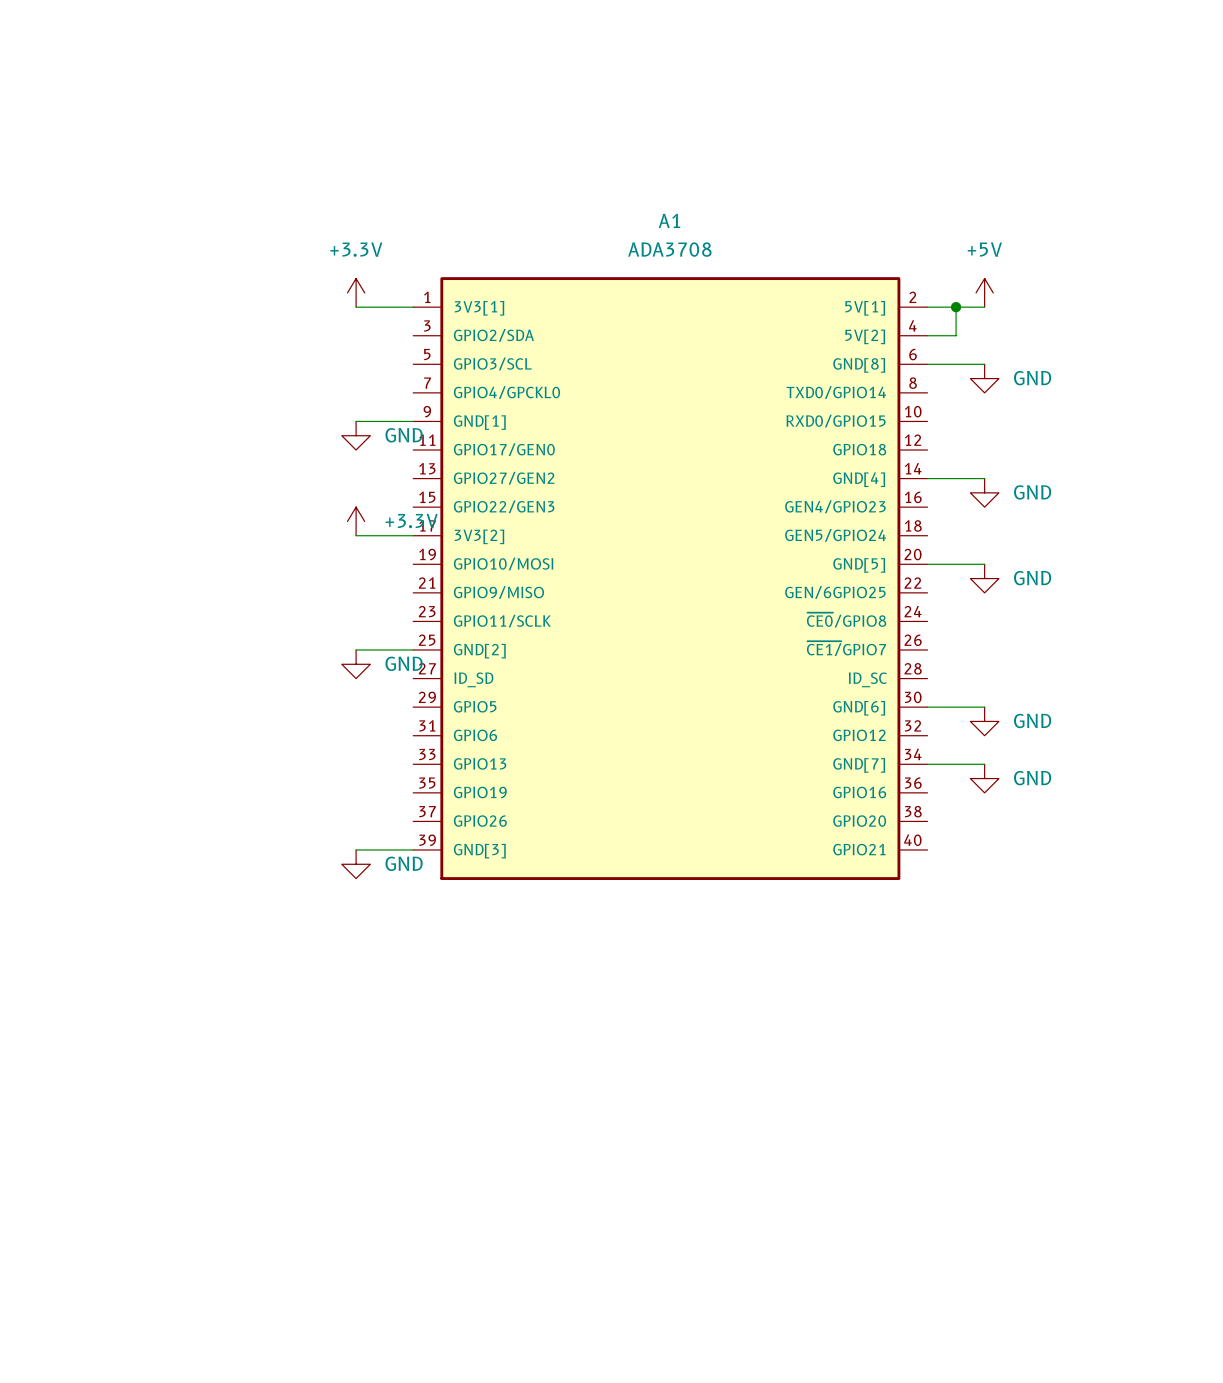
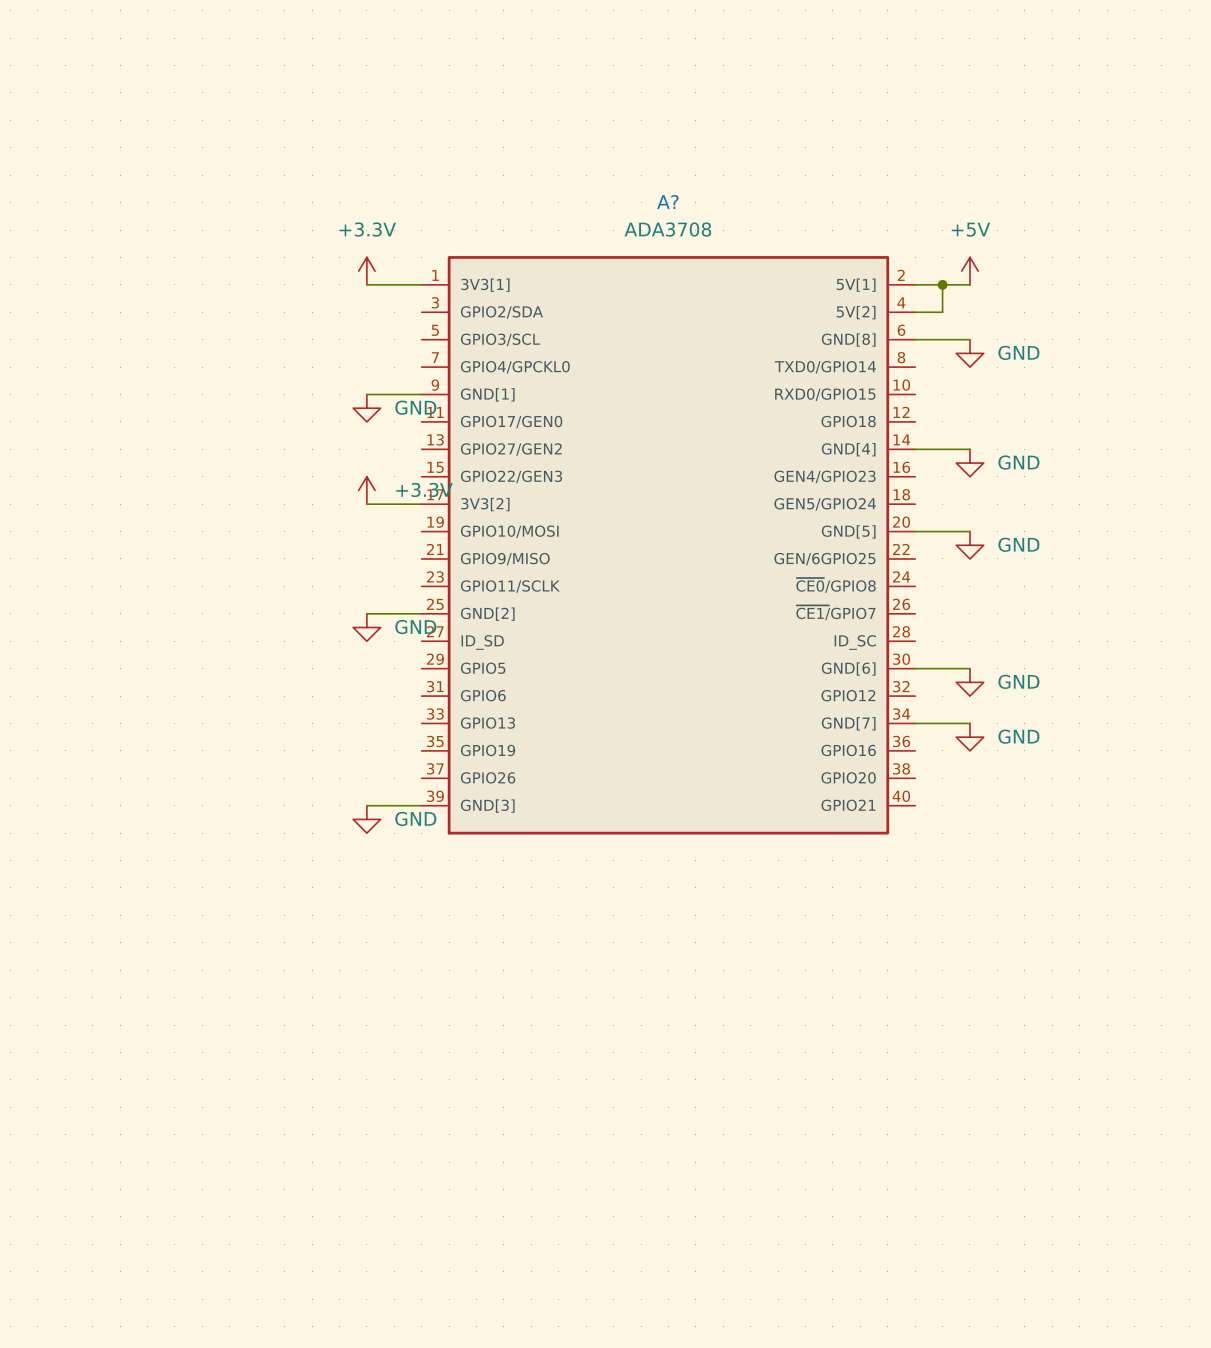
A1 name: A1 (669, 220) -> A? (667, 201)

